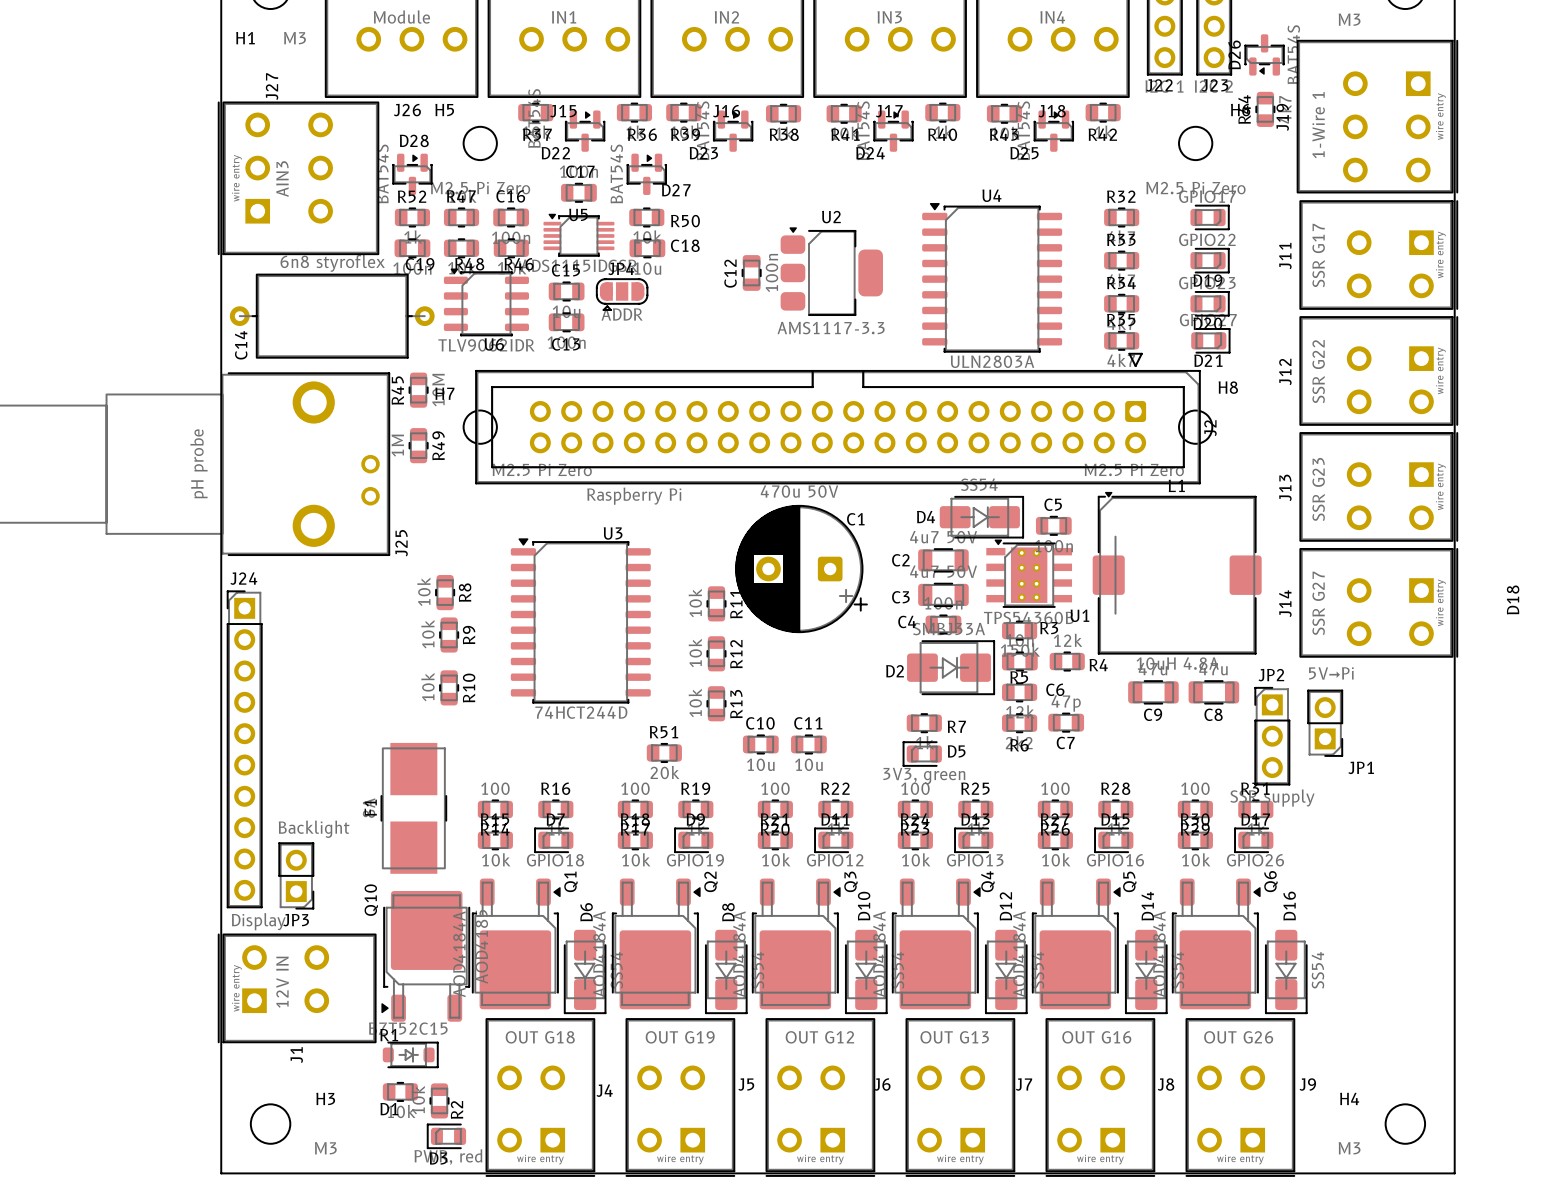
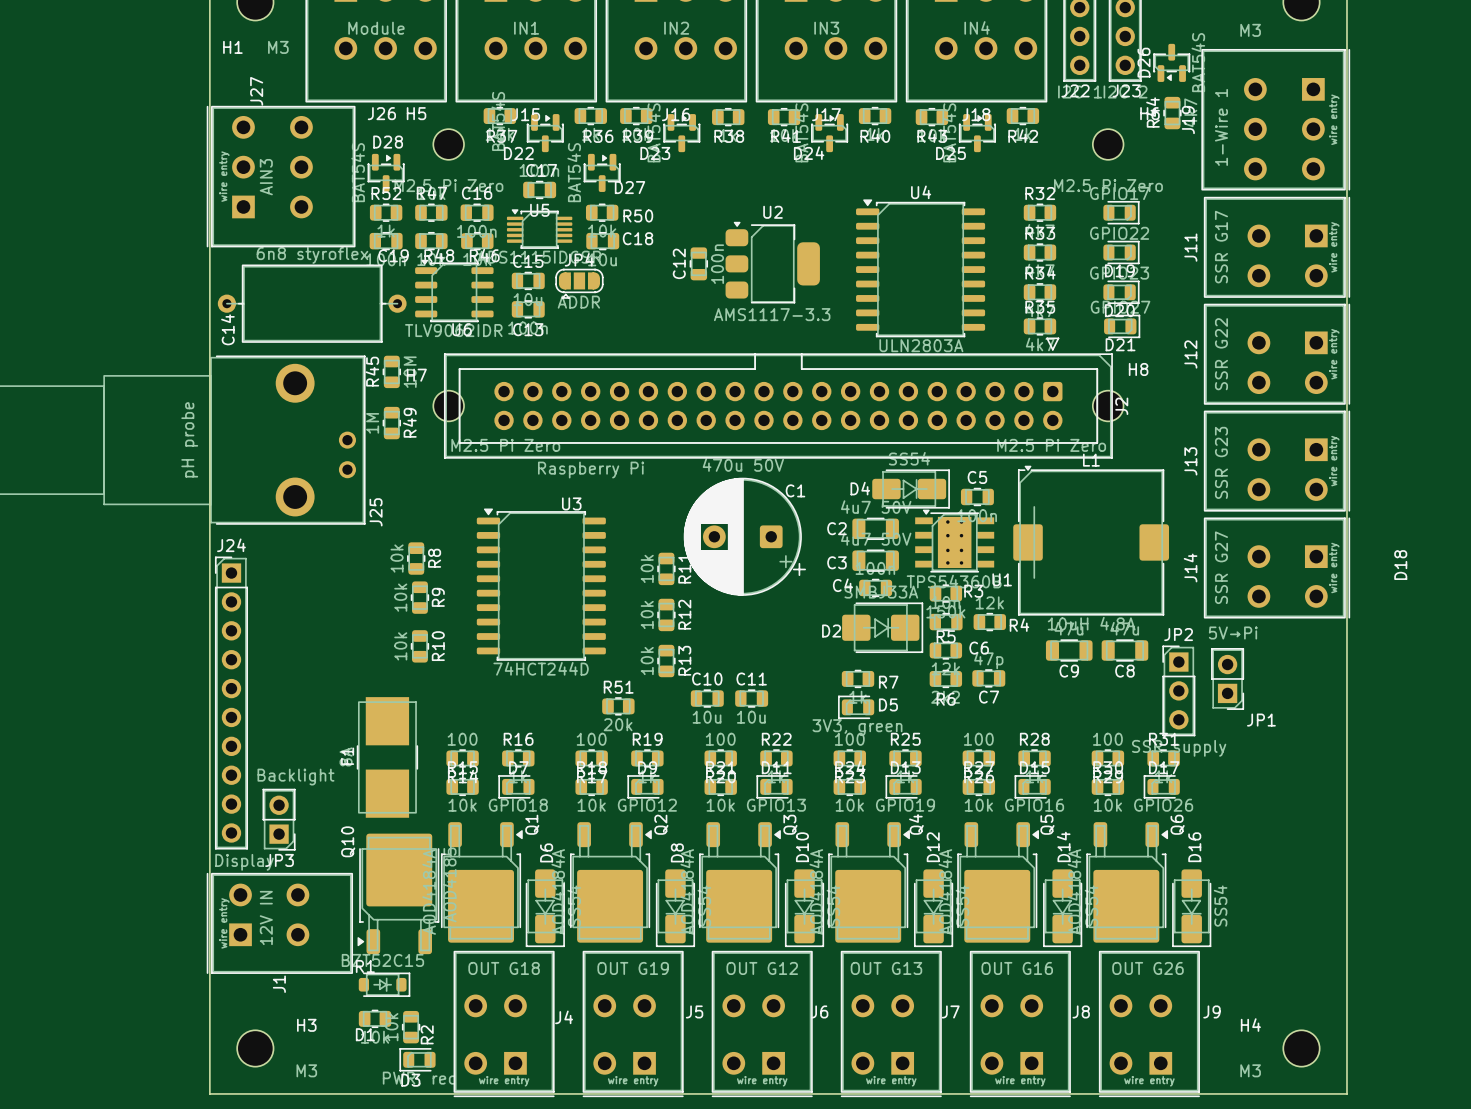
D9 value: GPIO19 (695, 860) -> GPIO12 (647, 805)
D11 value: GPIO12 (835, 860) -> GPIO13 (776, 805)
D13 value: GPIO13 (975, 860) -> GPIO19 (905, 805)

